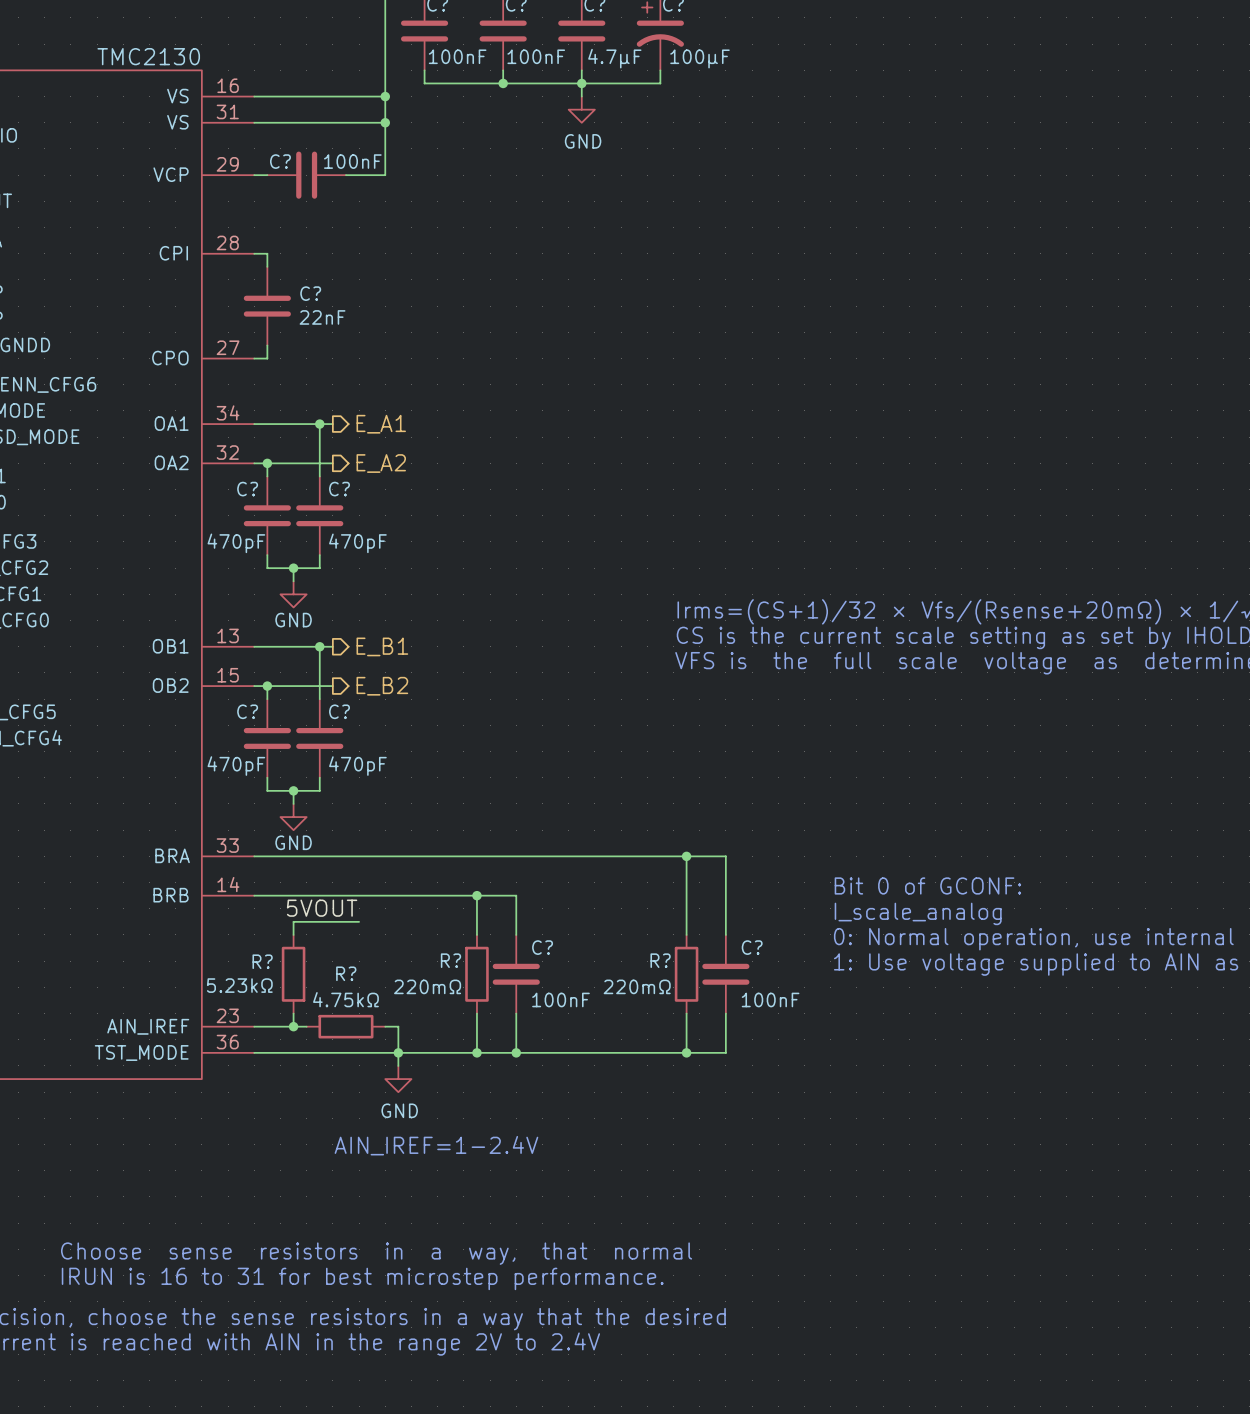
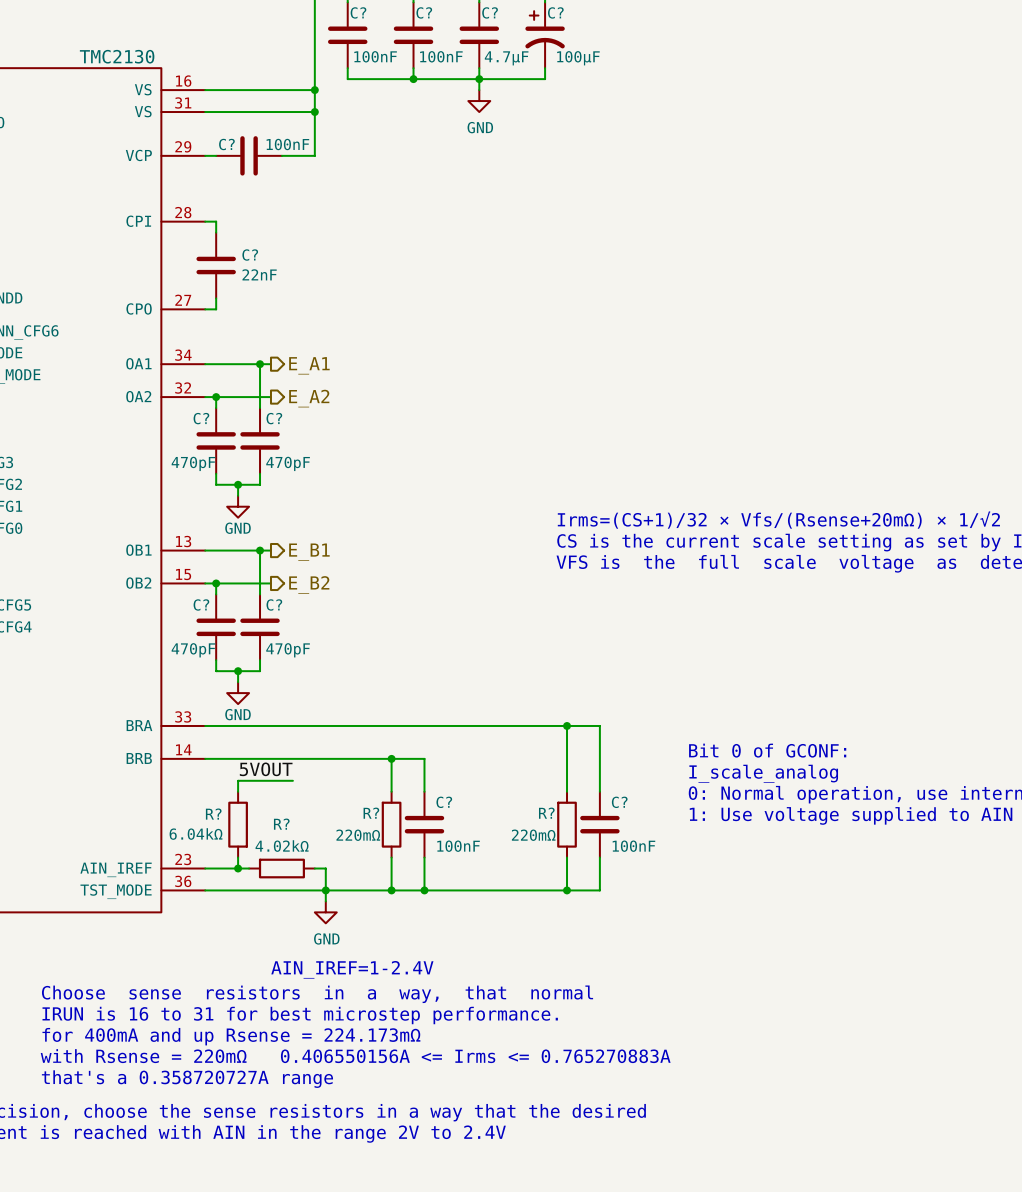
R? value: 5.23kΩ (239, 985) -> 6.04kΩ (196, 833)
R? value: 4.75kΩ (345, 999) -> 4.02kΩ (282, 846)
text: none -> Choose sense resistors in a way, that normal (317, 994)
text: none -> IRUN is 16 to 31 for best microstep performance. (300, 1015)
text: none -> for 400mA and up Rsense = 224.173mΩ (231, 1036)
text: Choose sense resistors in a way, that normal (376, 1253) -> with Rsense = 220mΩ 0.406550156A <= Irms <= 0.765270883A (355, 1056)
text: IRUN is 16 to 31 for best microstep performance. (362, 1278) -> that's a 0.358720727A range (187, 1079)

